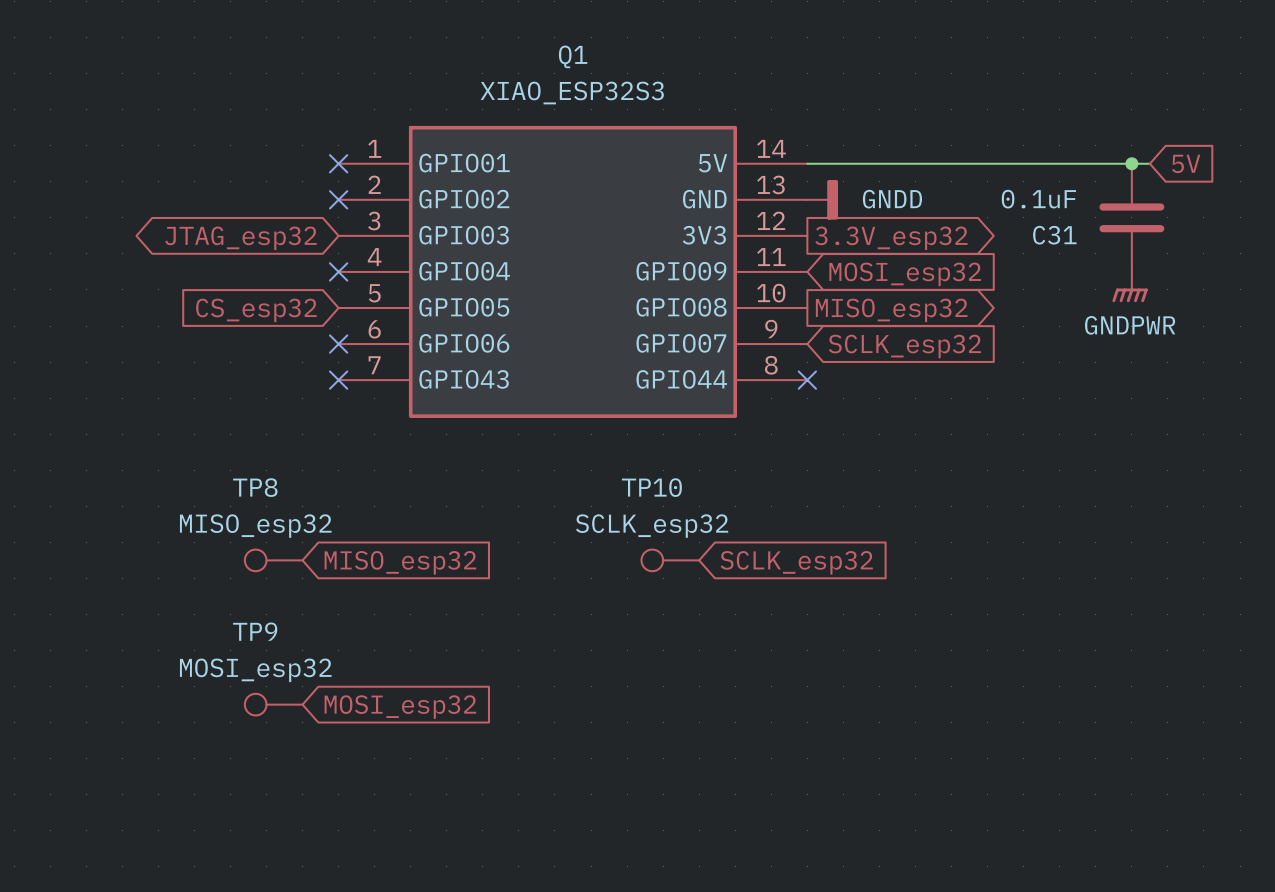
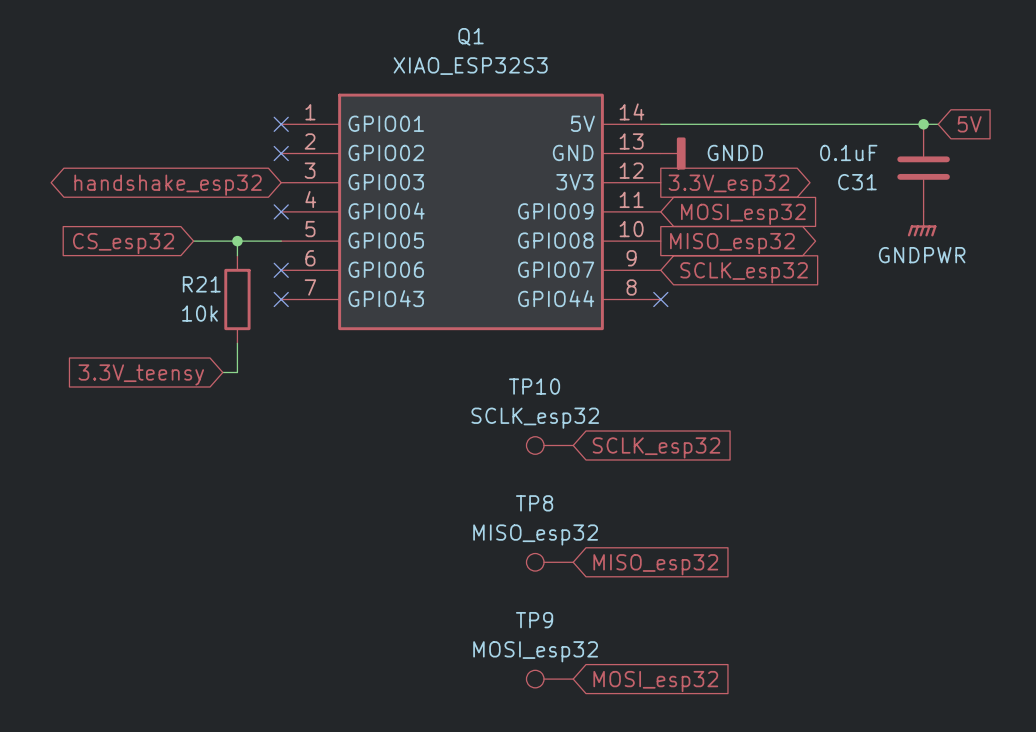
global label: JTAG_esp32 (240, 238) -> handshake_esp32 (168, 185)
wire: none -> (193, 241) (281, 241)
wire: none -> (237, 241) (237, 255)
junction: none -> (237, 241)
global label position: CS_esp32 (256, 310) -> CS_esp32 (123, 243)
R21: none -> 10k (237, 299)
wire: none -> (237, 343) (237, 372) (222, 372)
global label: none -> 3.3V_teensy (141, 374)
TP8 position: (273, 560) -> (549, 562)
global label: MISO_esp32 (400, 562) -> none
TP9 position: (273, 704) -> (549, 679)
global label: MOSI_esp32 (400, 707) -> none
global label: none -> MISO_esp32 (655, 564)
global label: none -> MOSI_esp32 (655, 681)

